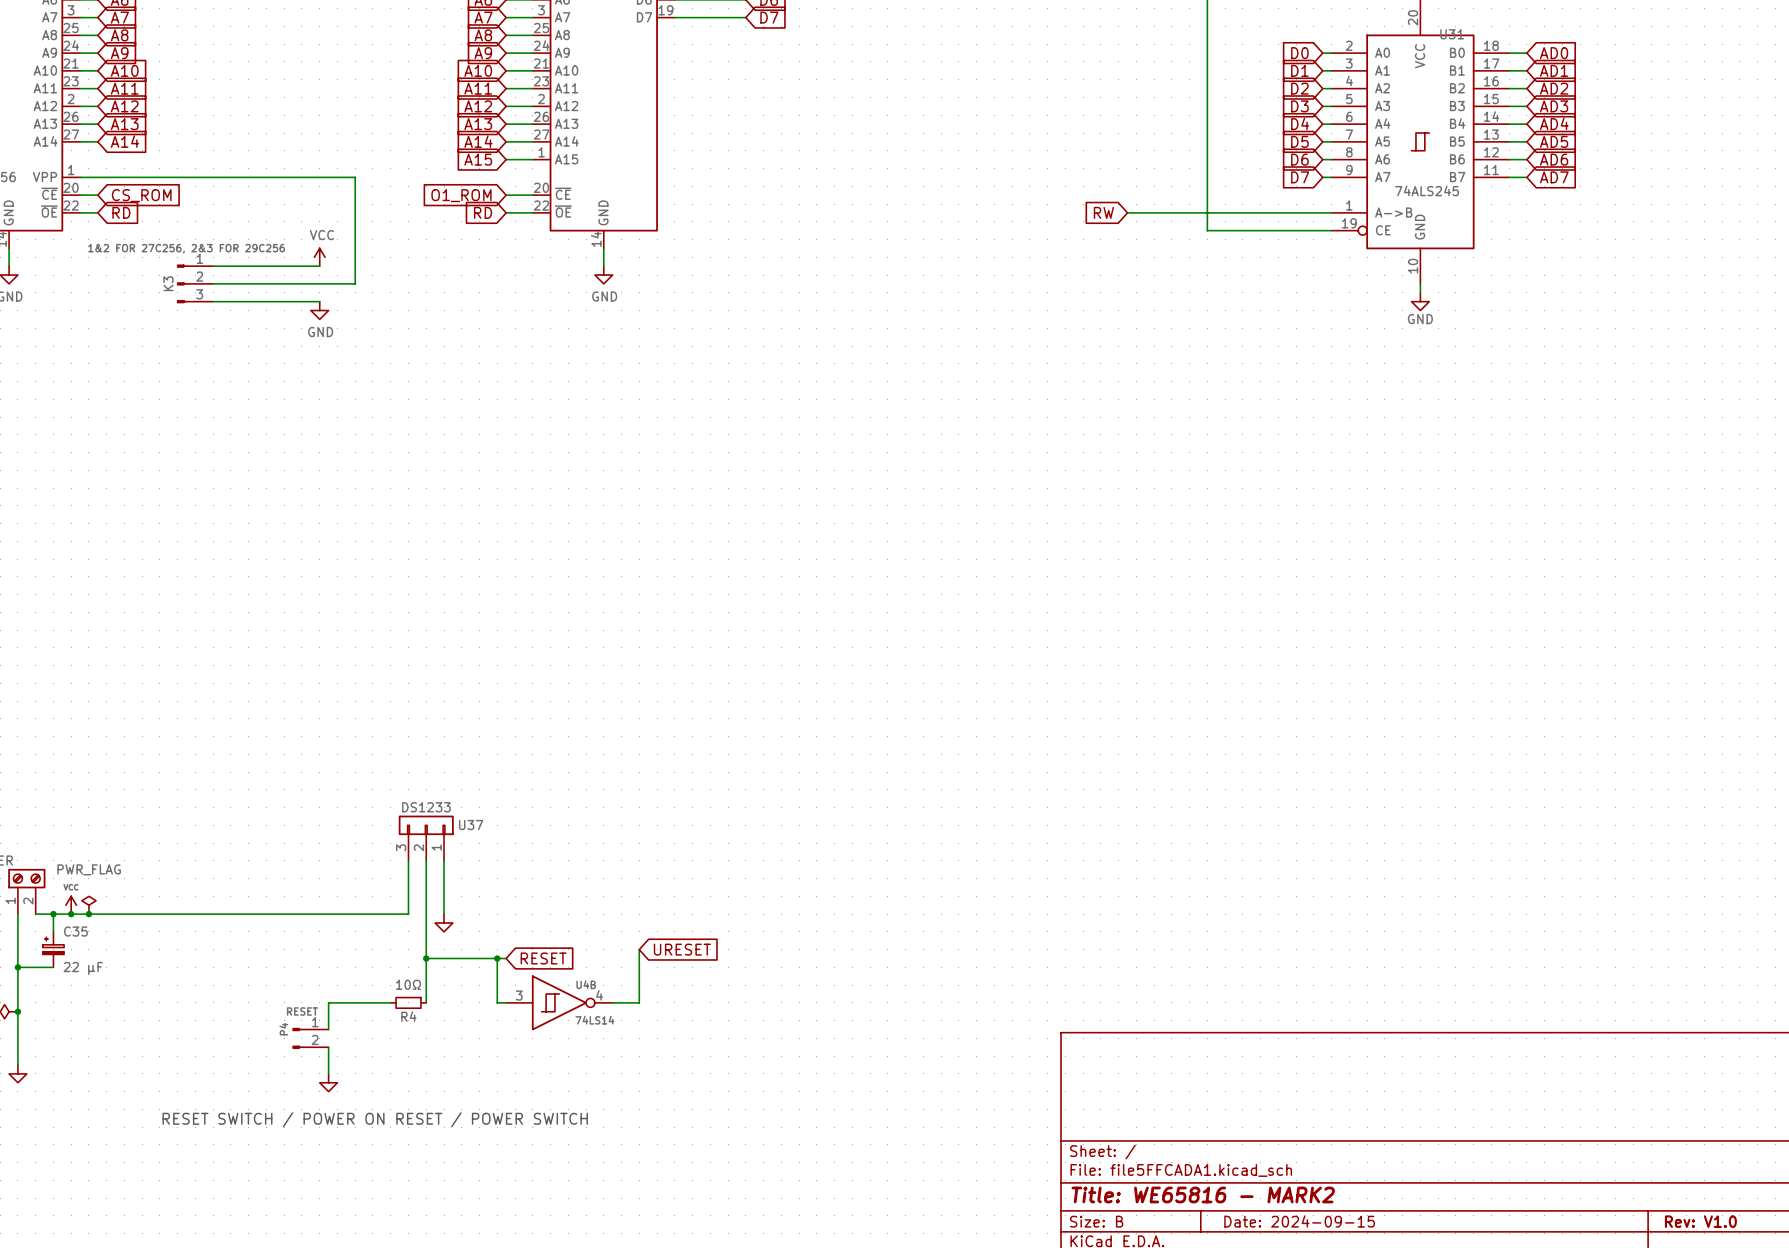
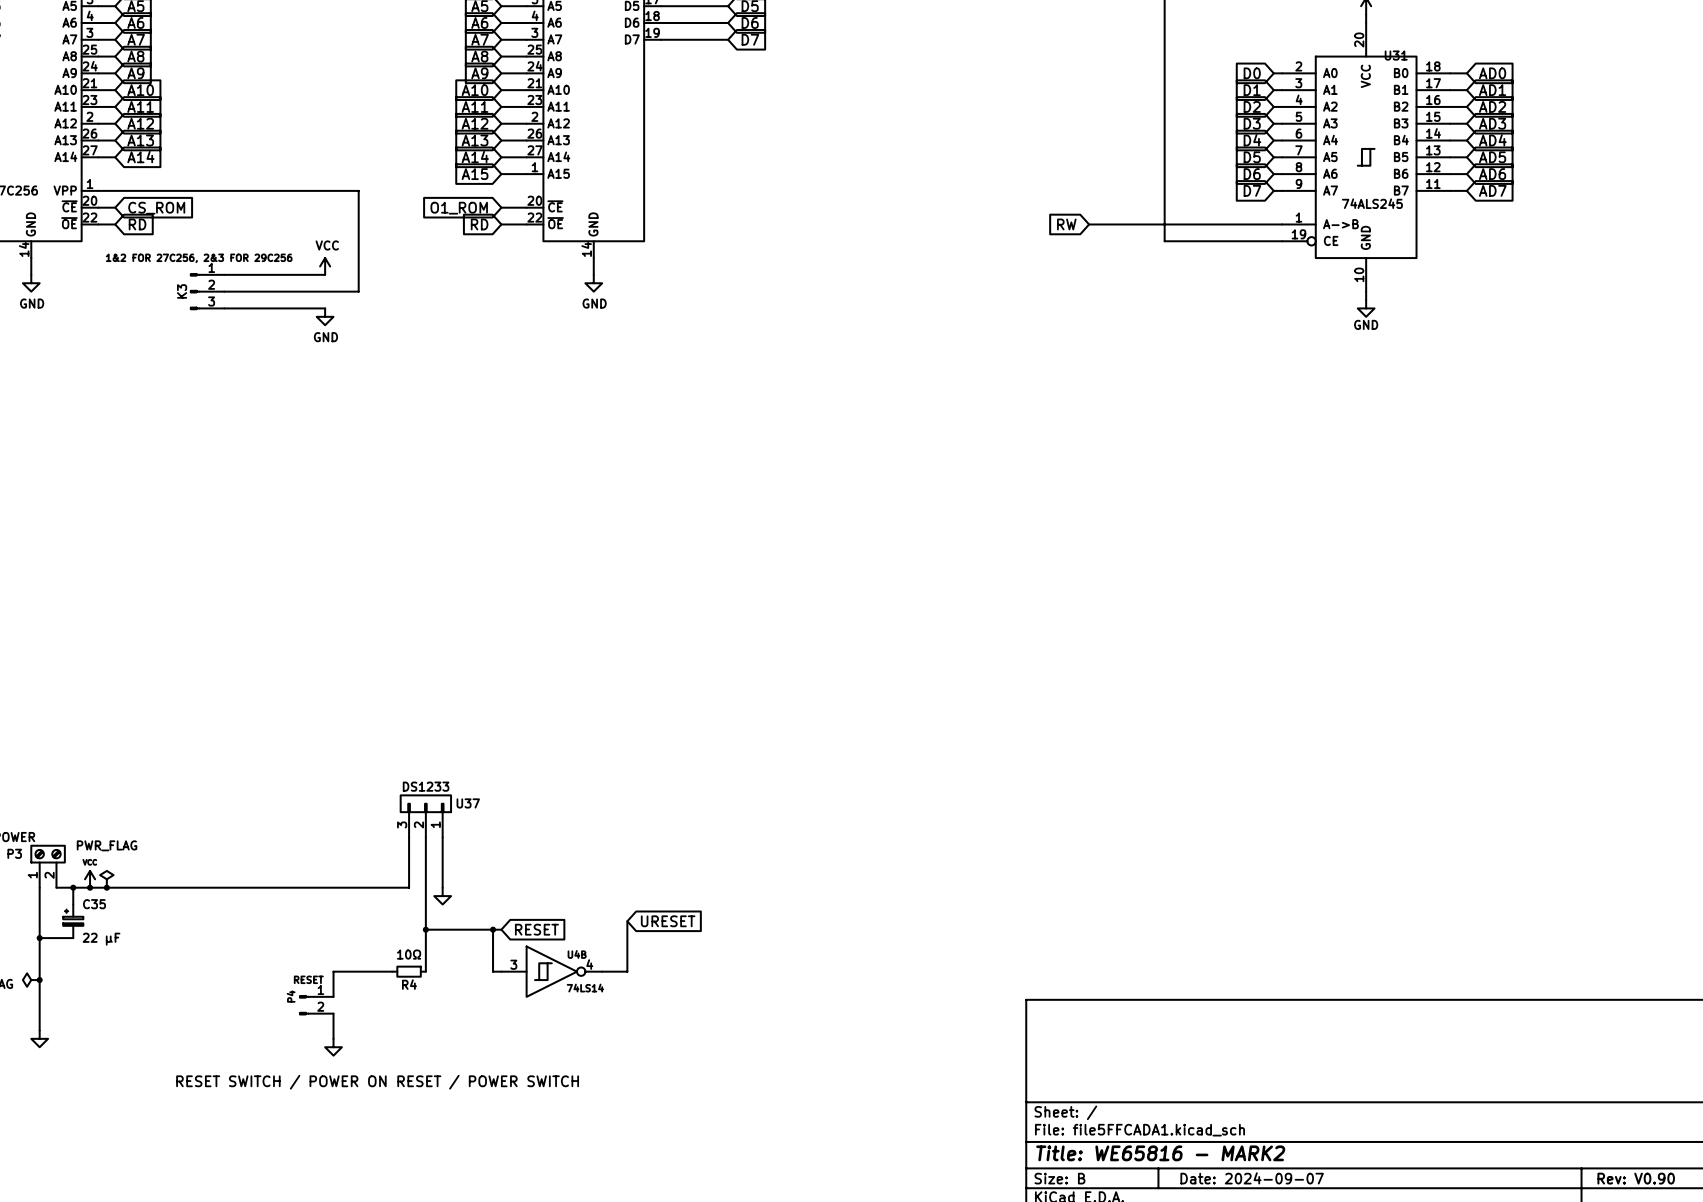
title block: Date: 2024-09-15 (1299, 1221) -> Date: 2024-09-07 (1252, 1178)
title block: Rev: V1.0 (1700, 1221) -> Rev: V0.90 (1636, 1178)

